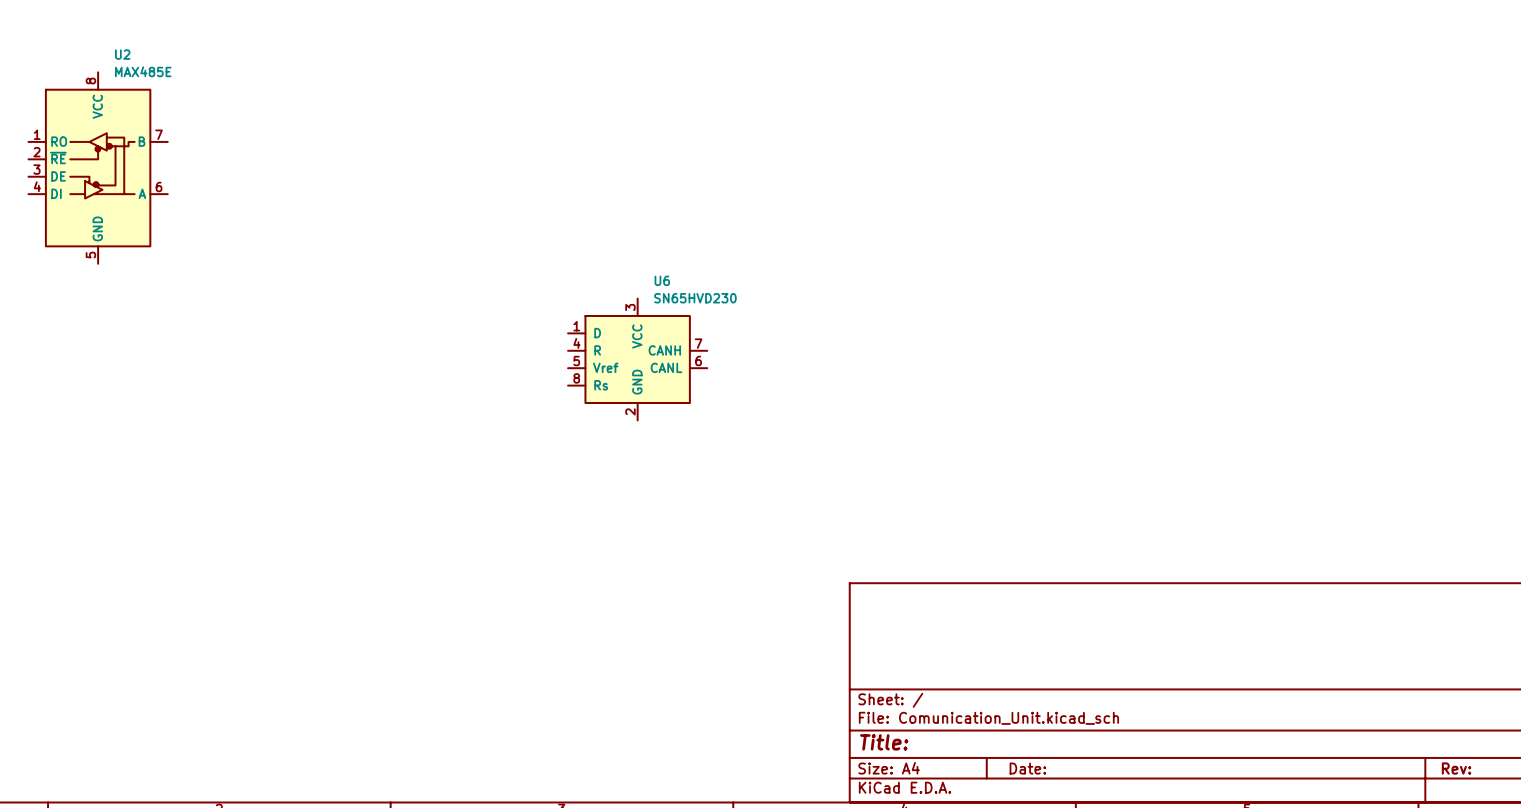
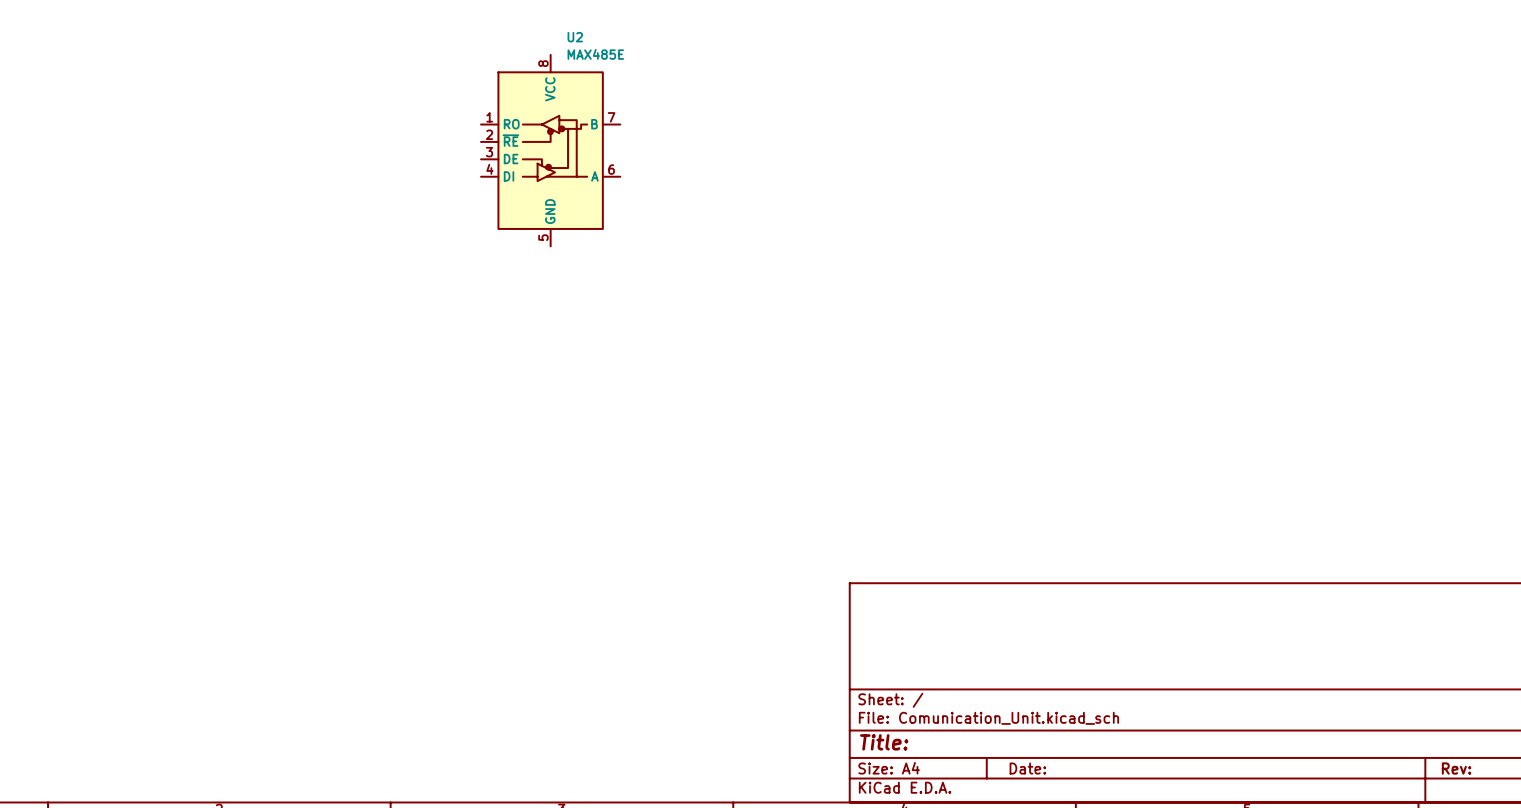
U2 position: (98, 168) -> (550, 150)
U6: SN65HVD230 (637, 359) -> none

